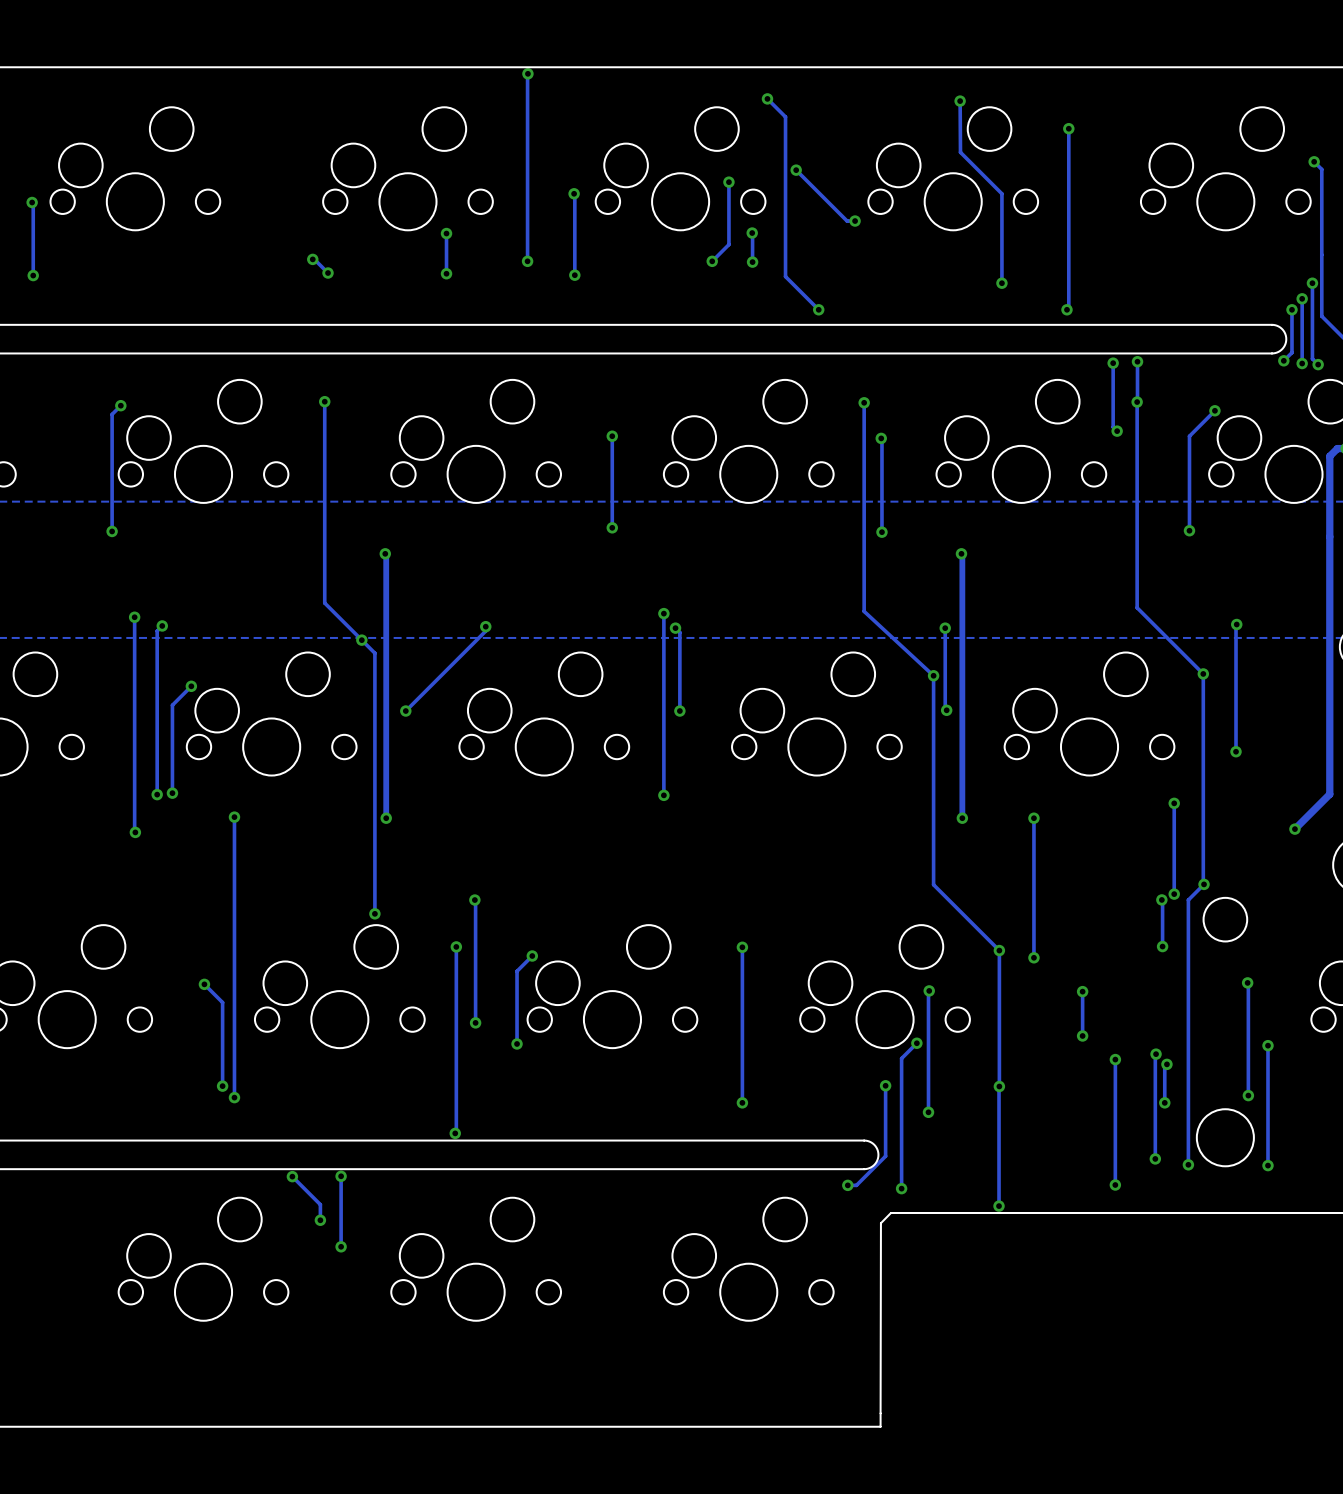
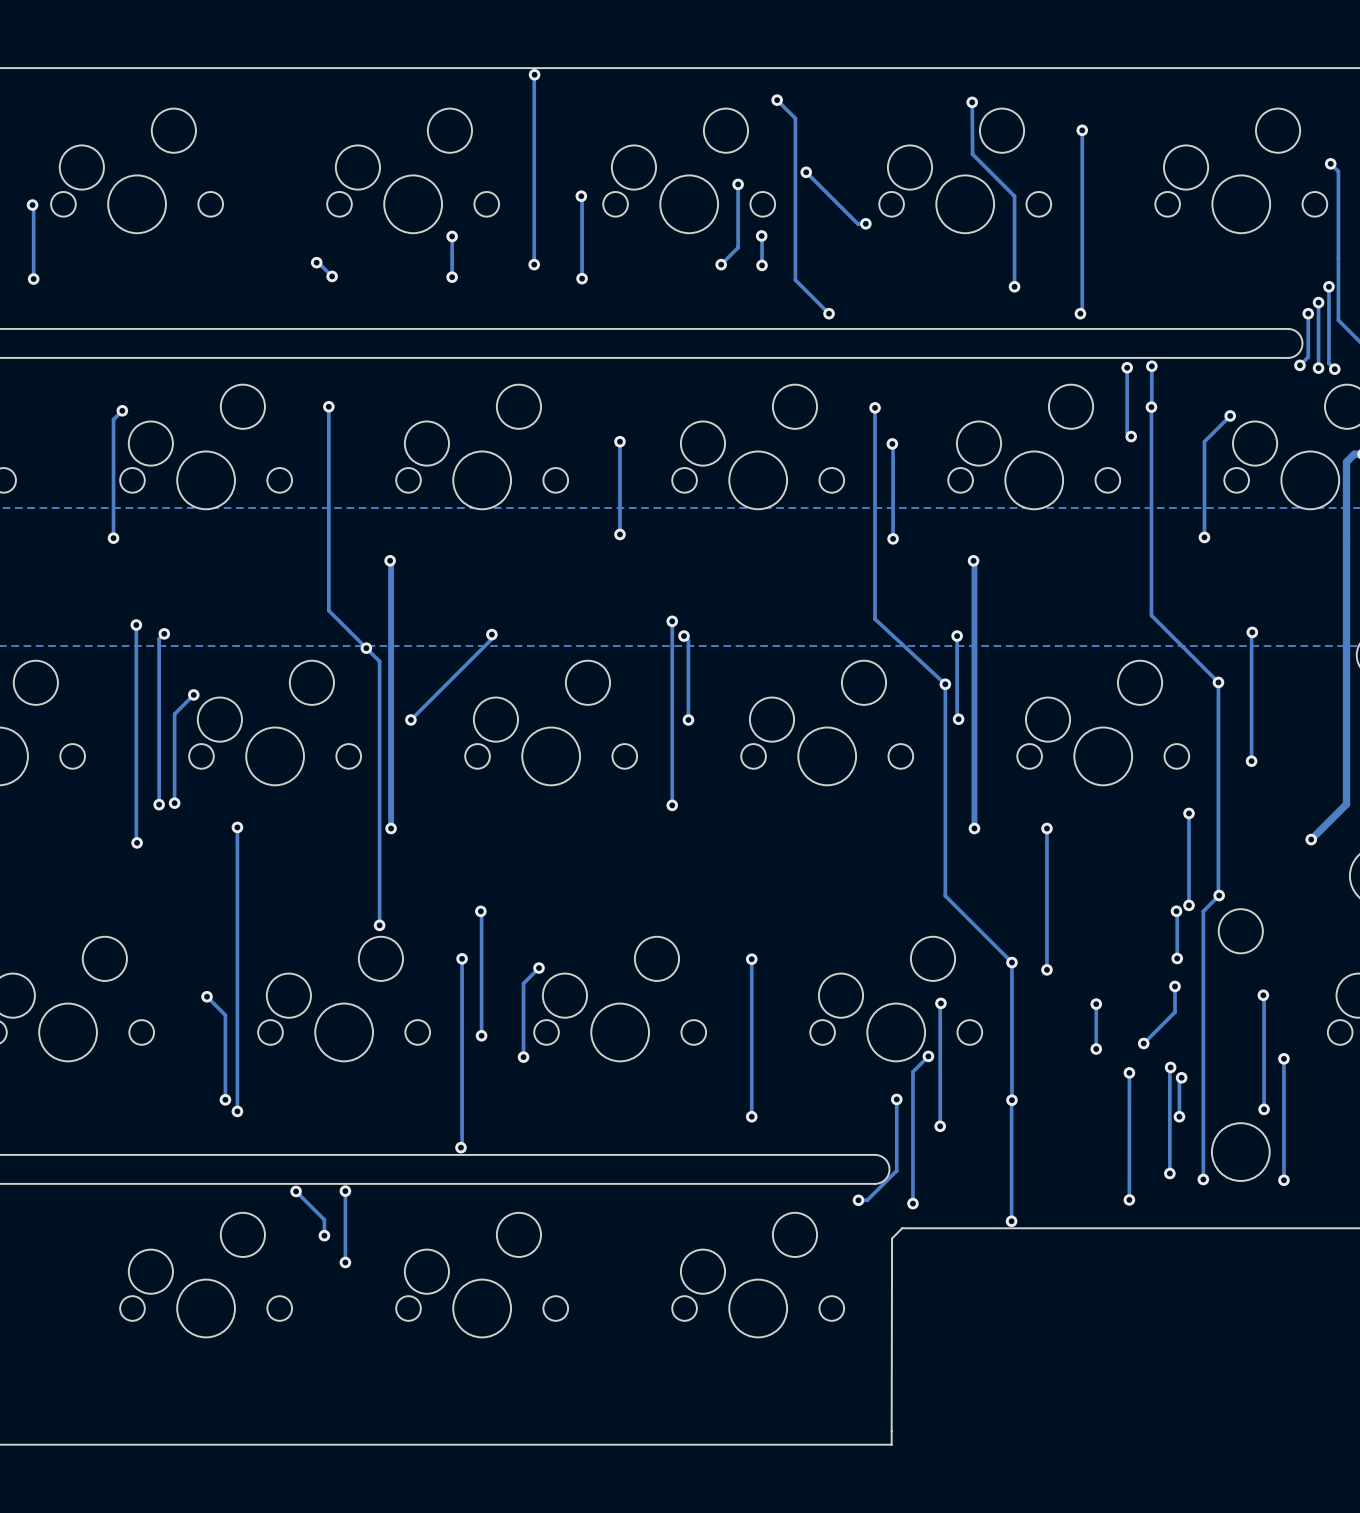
track: none -> (1175, 986) (1175, 1012) (1143, 1043)
via: none -> (1175, 986)
via: none -> (1143, 1043)

